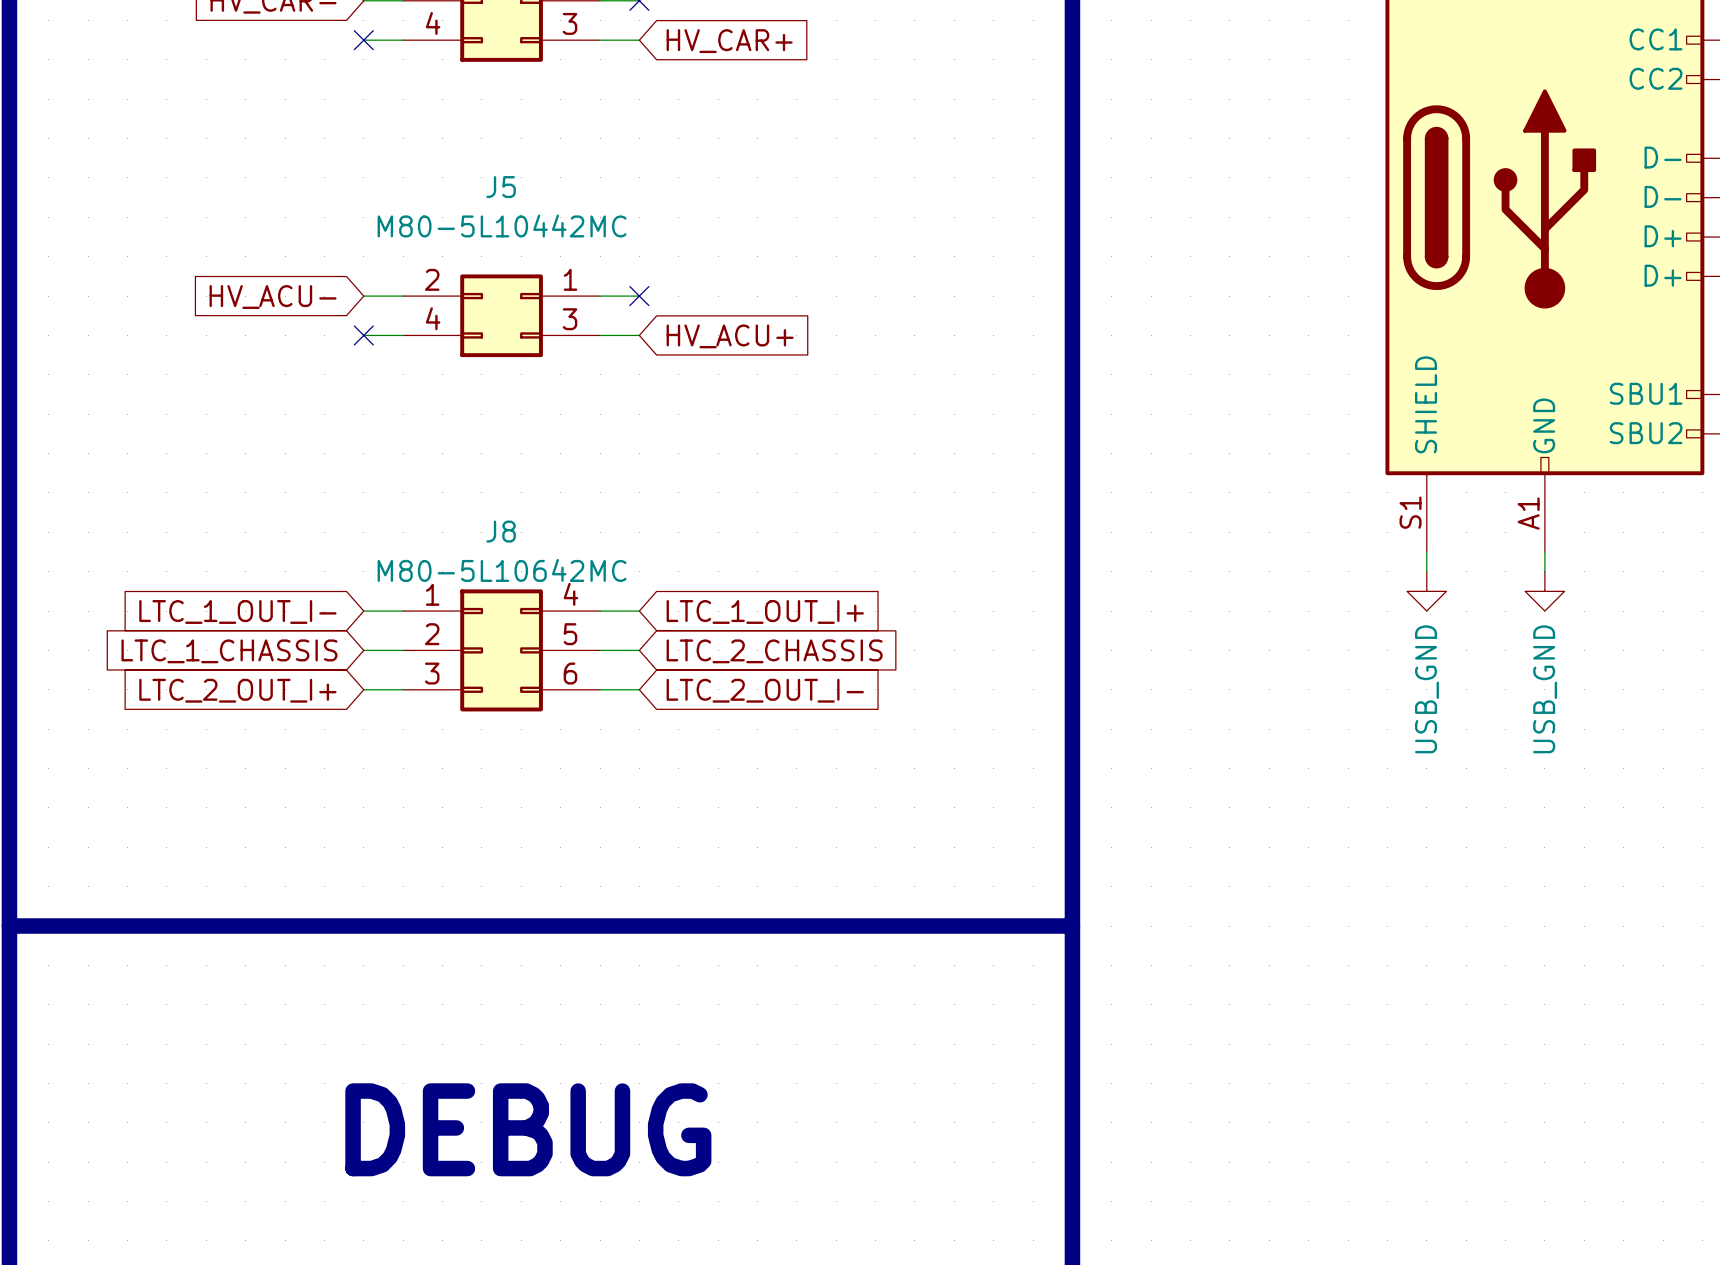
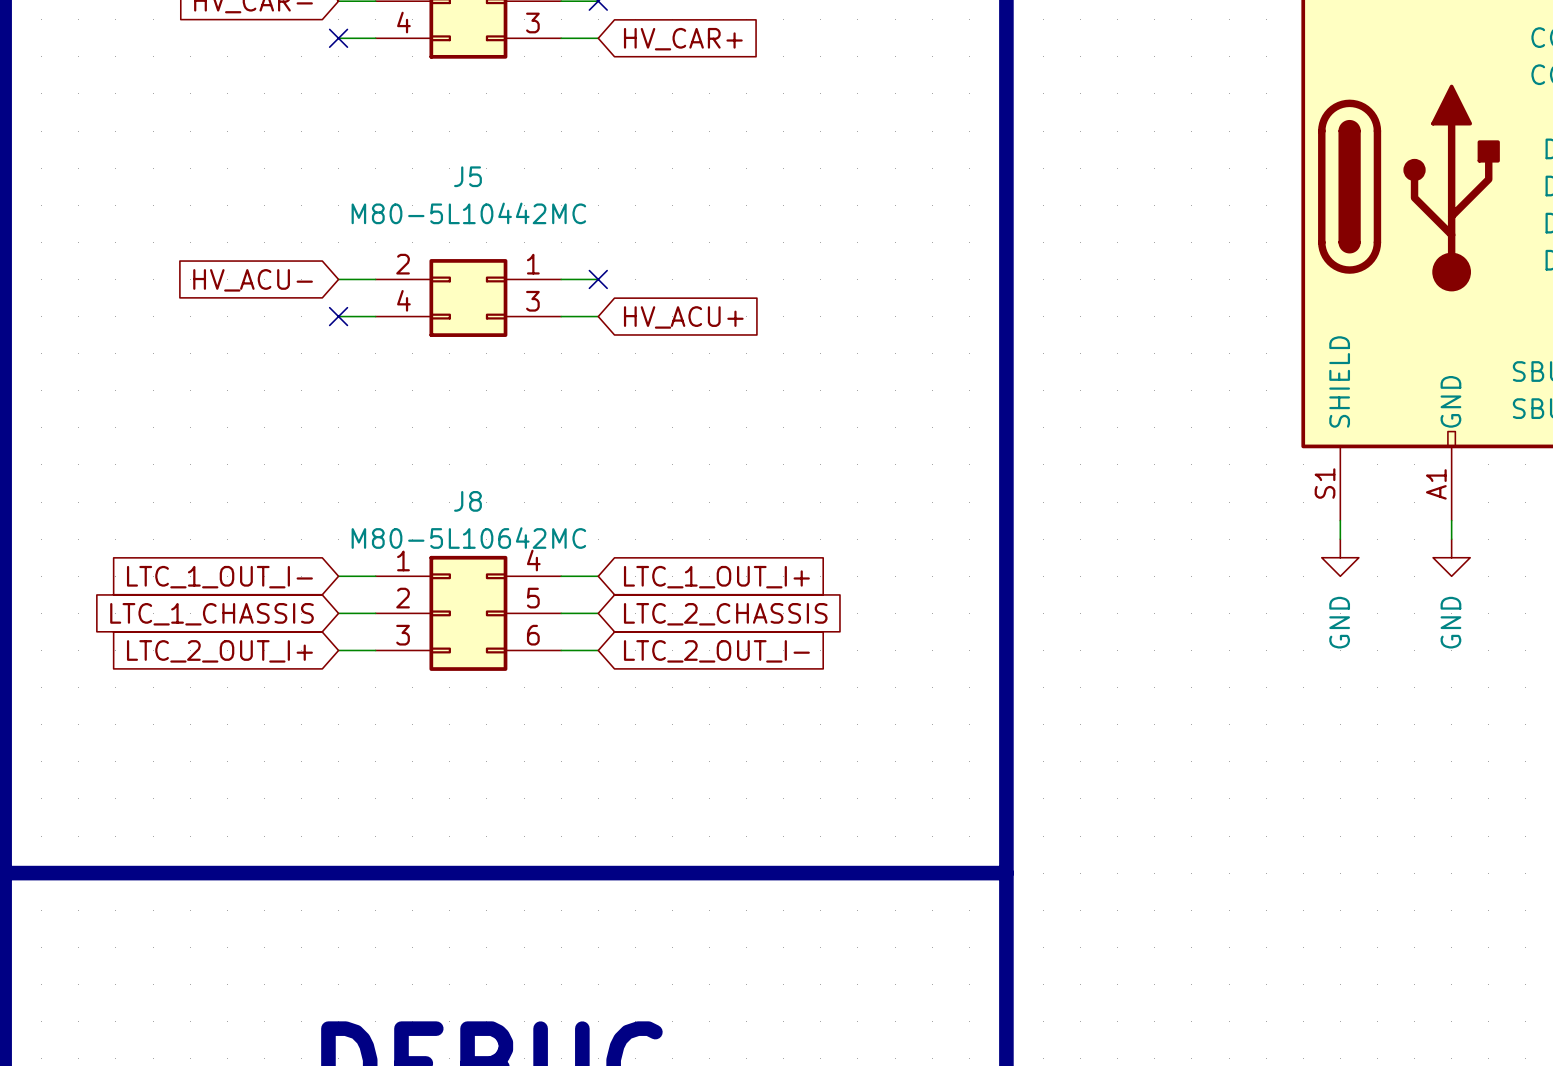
power symbol: USB_GND (1426, 591) -> GND (1340, 557)
power symbol: USB_GND (1544, 591) -> GND (1451, 557)

